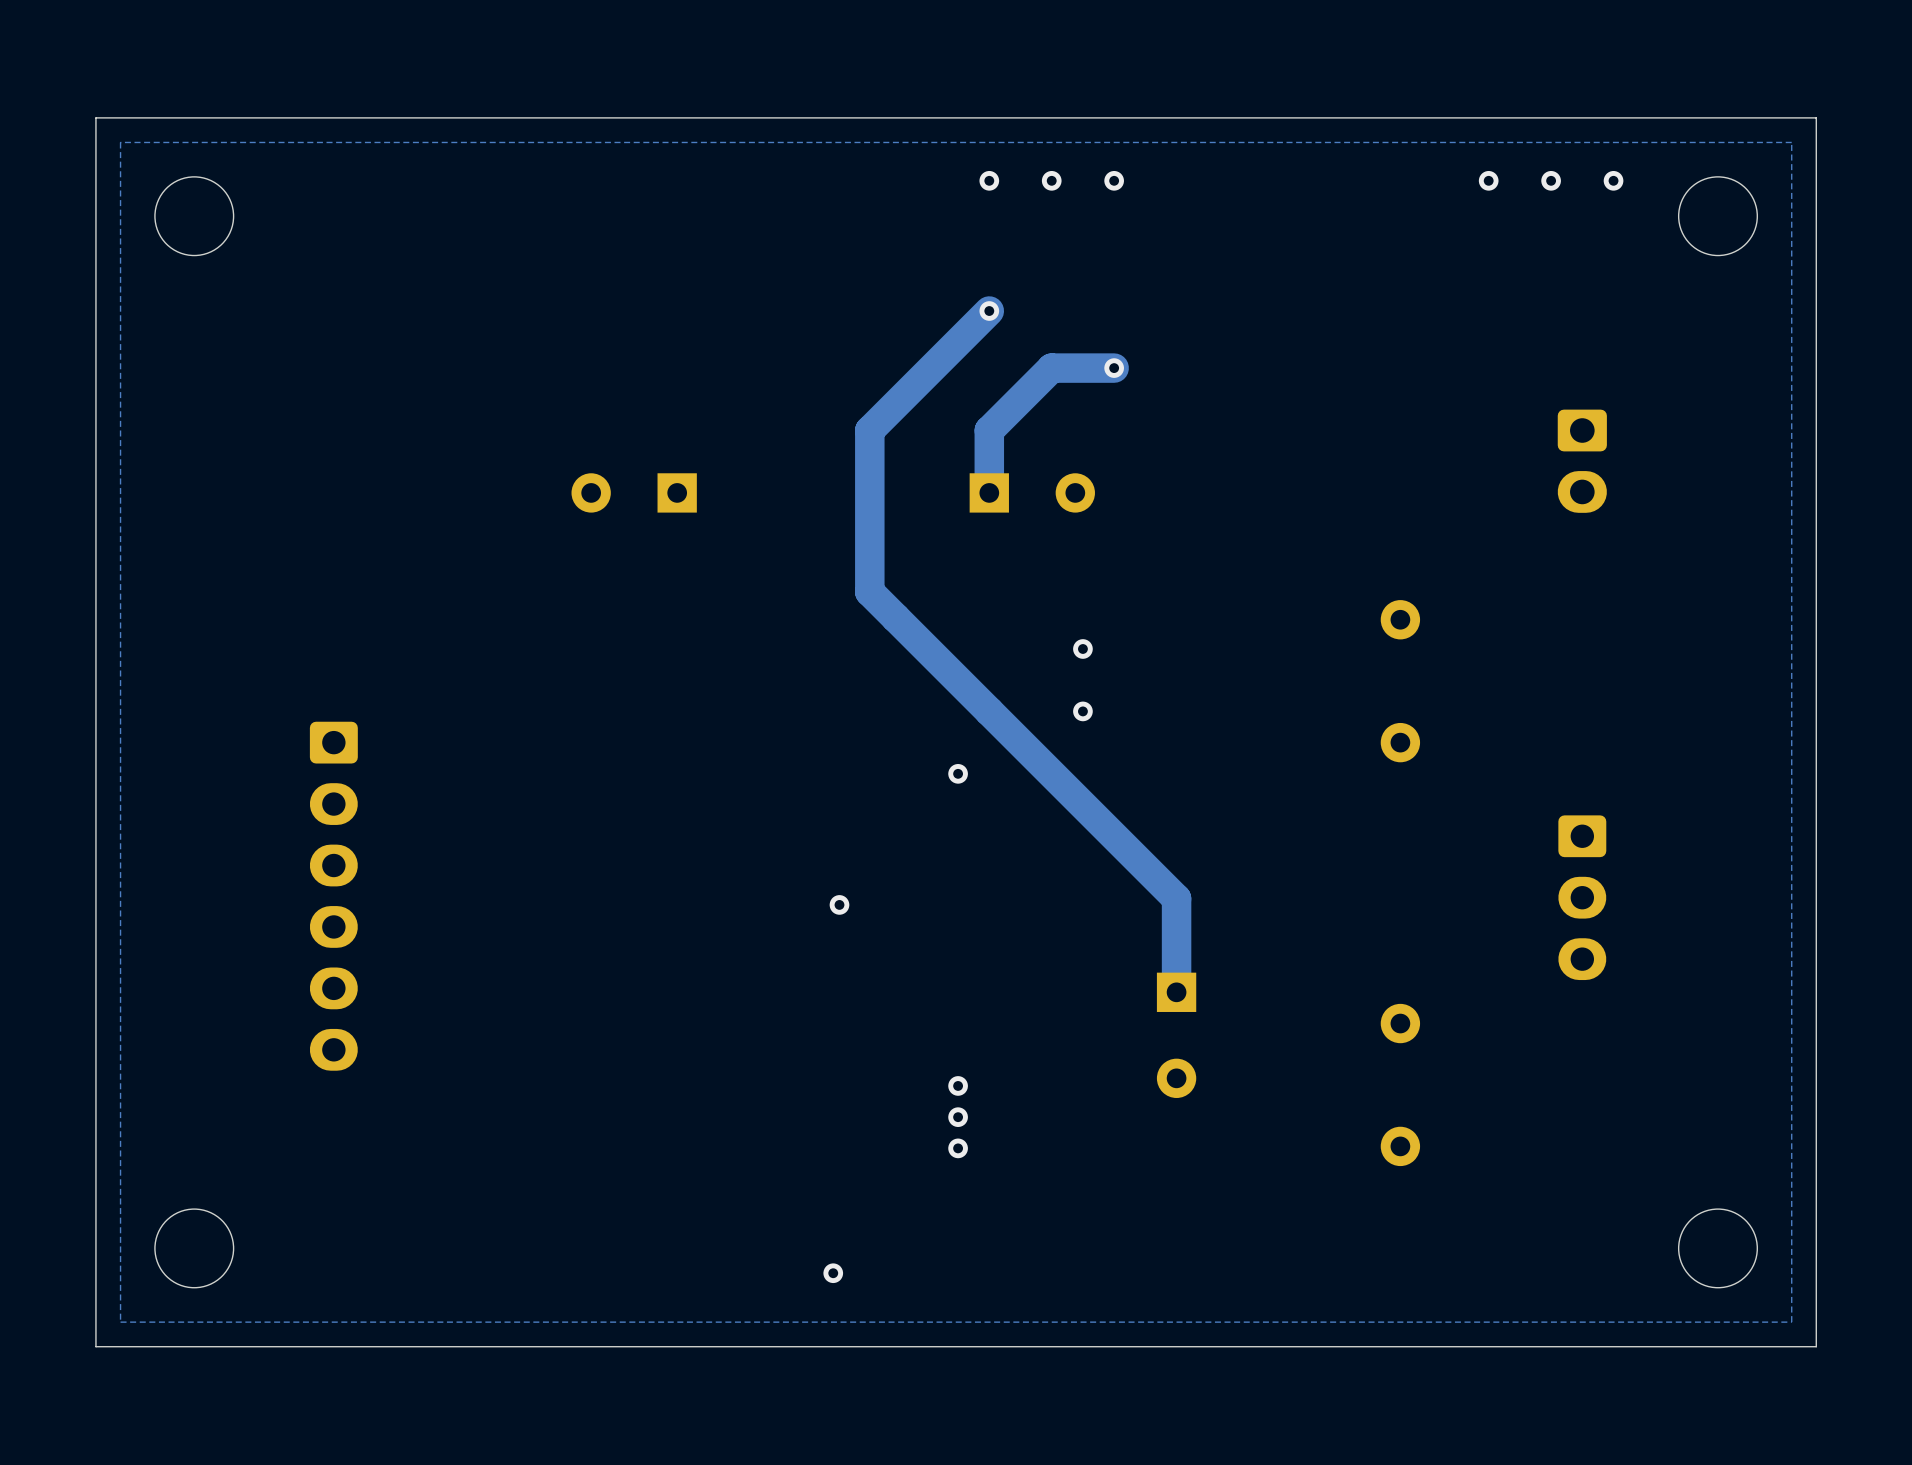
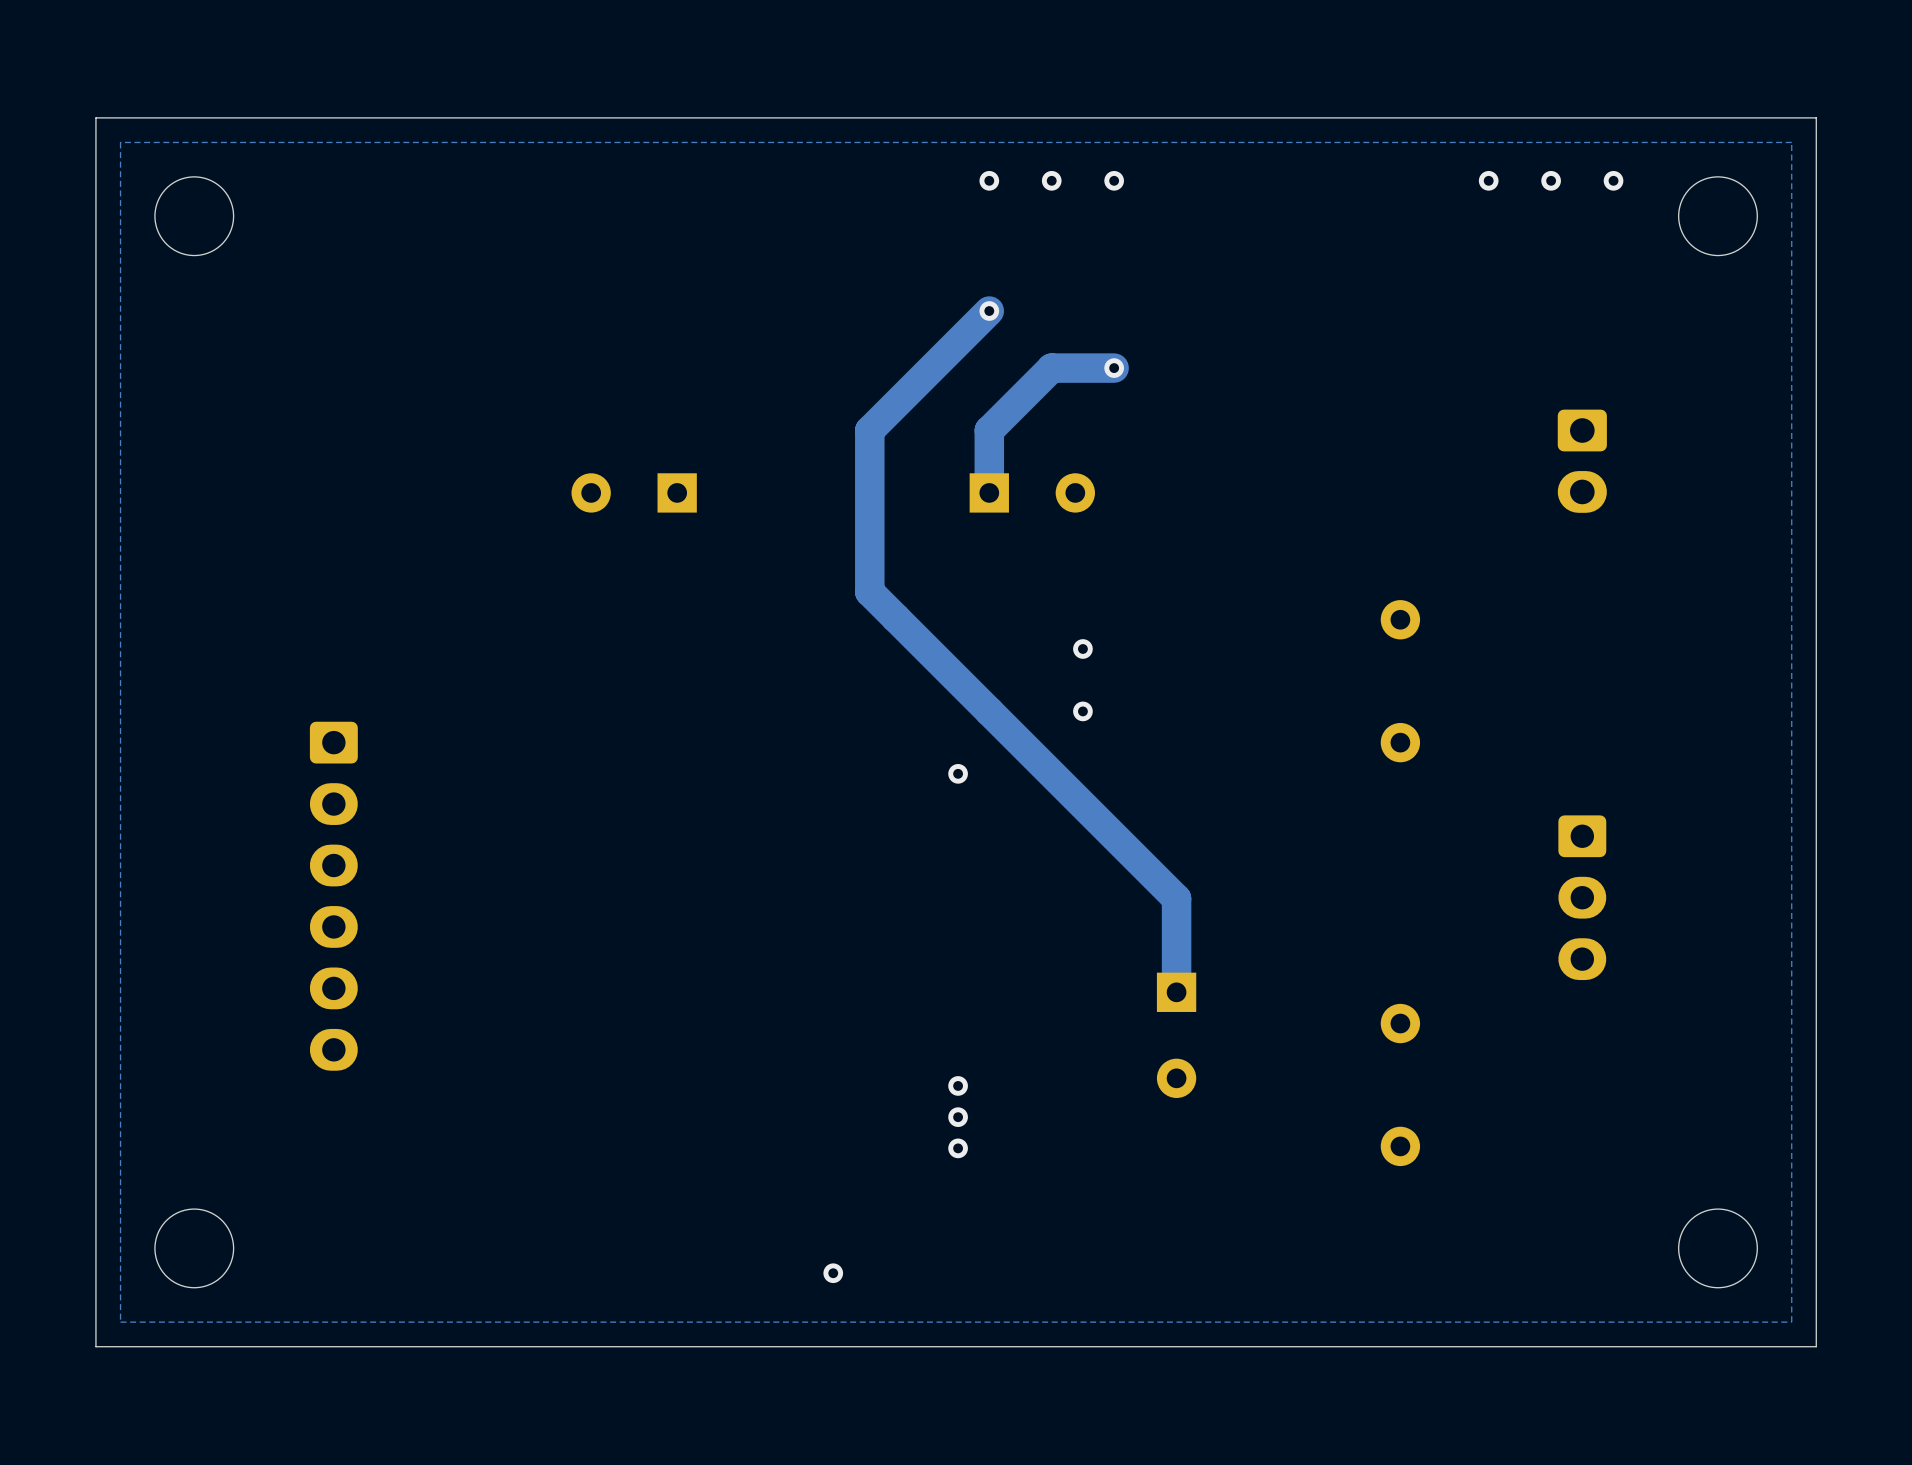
via: (839, 904) -> none

